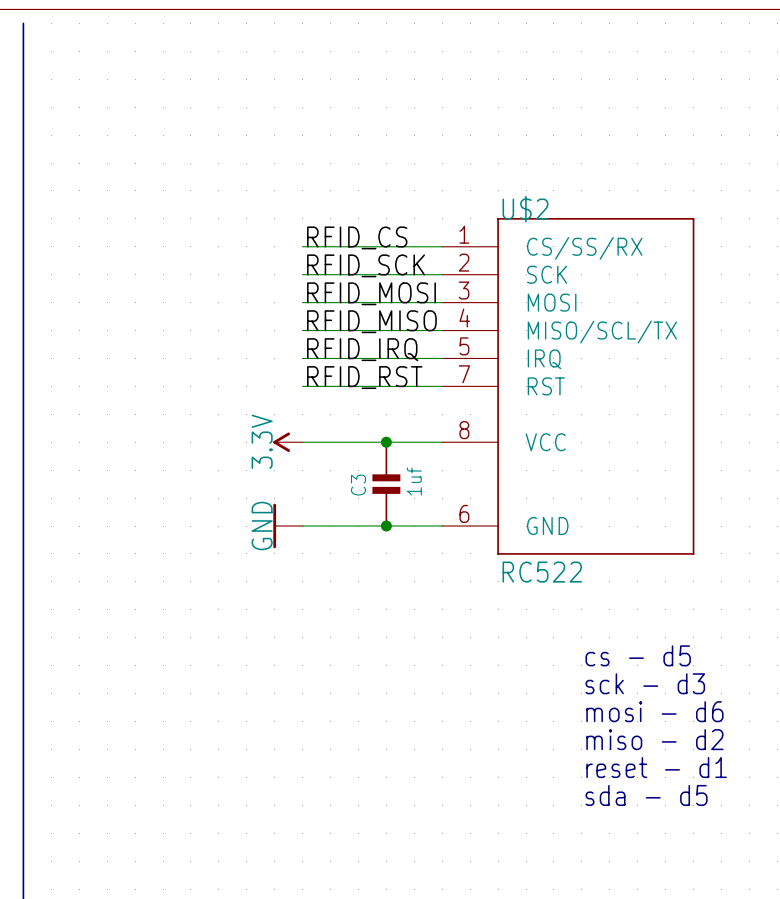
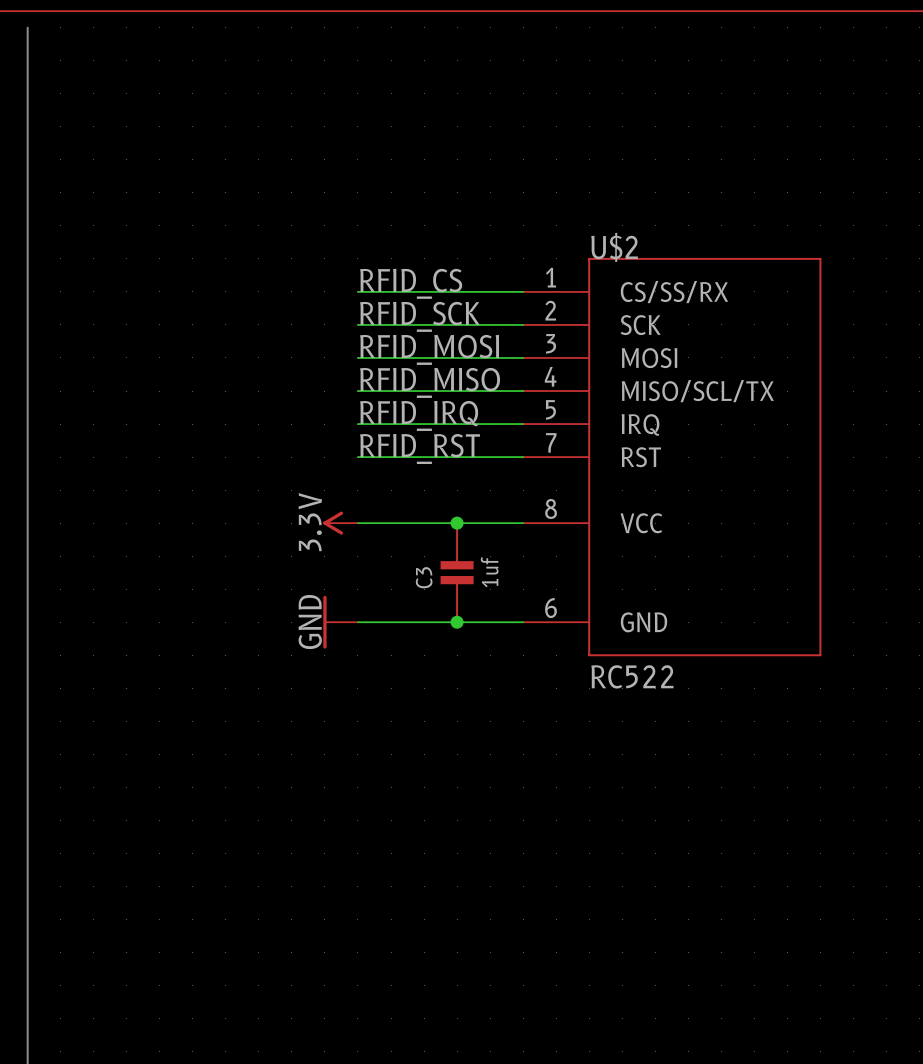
text: cs - d5 (638, 655) -> none
text: sck - d3 (645, 683) -> none
text: mosi - d6 (654, 711) -> none
text: miso - d2 (654, 739) -> none
text: reset - d1 (656, 767) -> none
text: sda - d5 (646, 795) -> none

